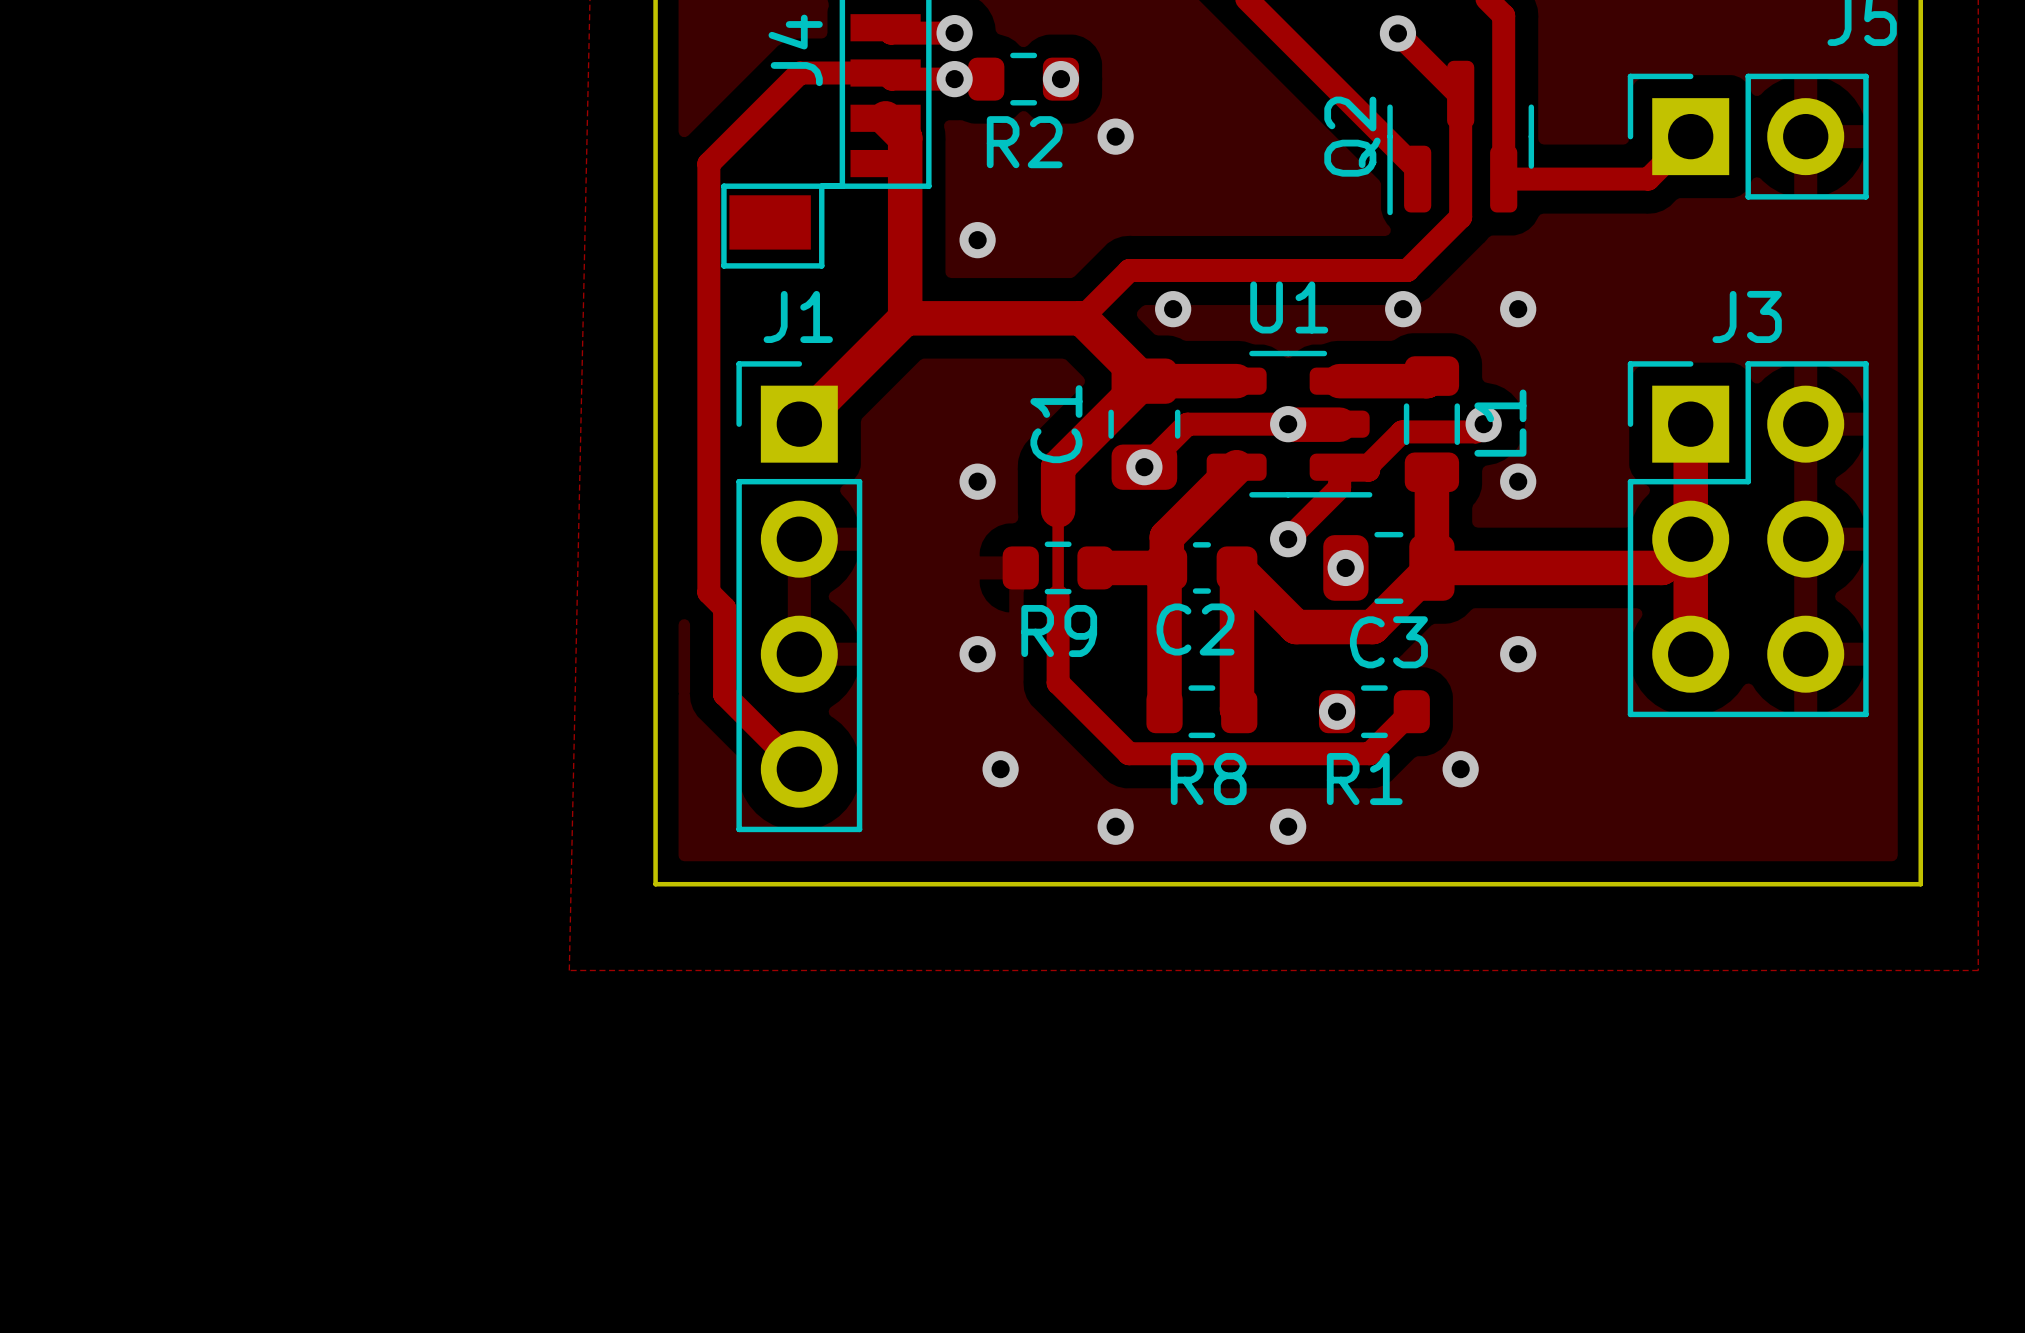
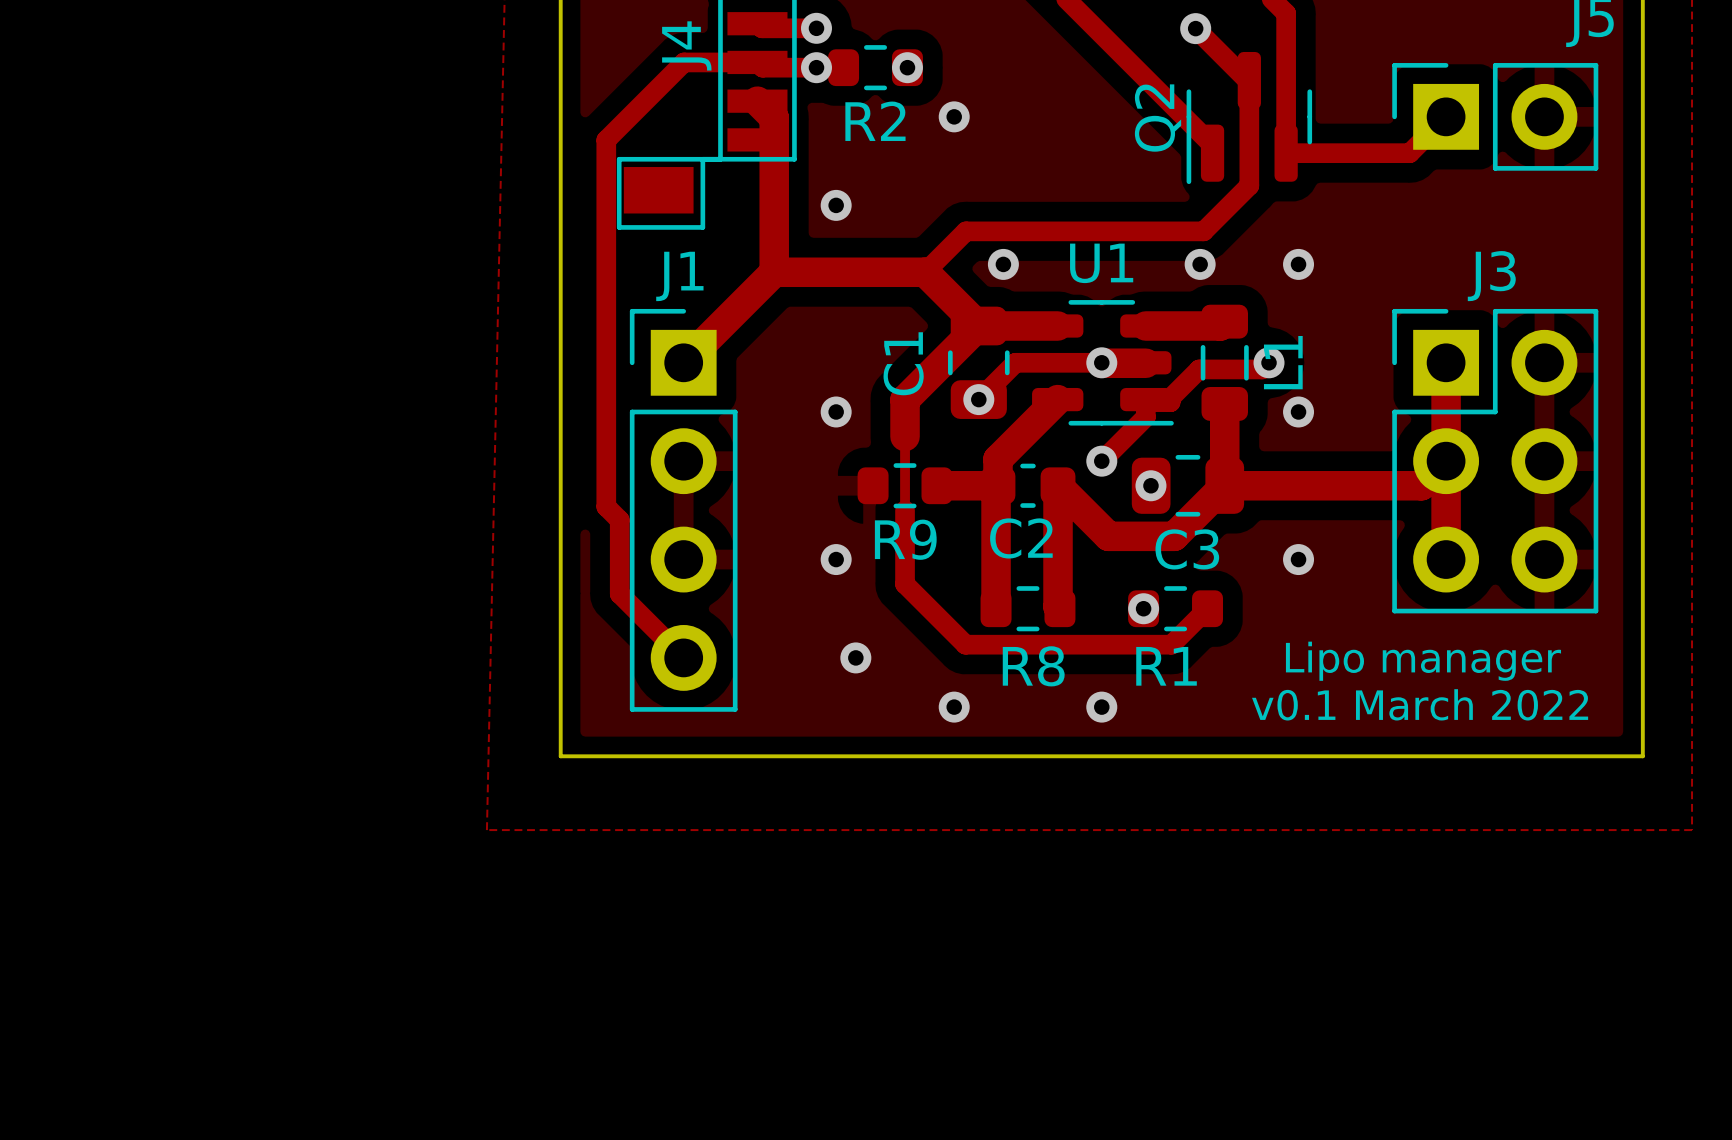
via: (1460, 769) -> none
text: none -> Lipo manager (1423, 661)
text: none -> v0.1 March 2022 (1420, 704)

